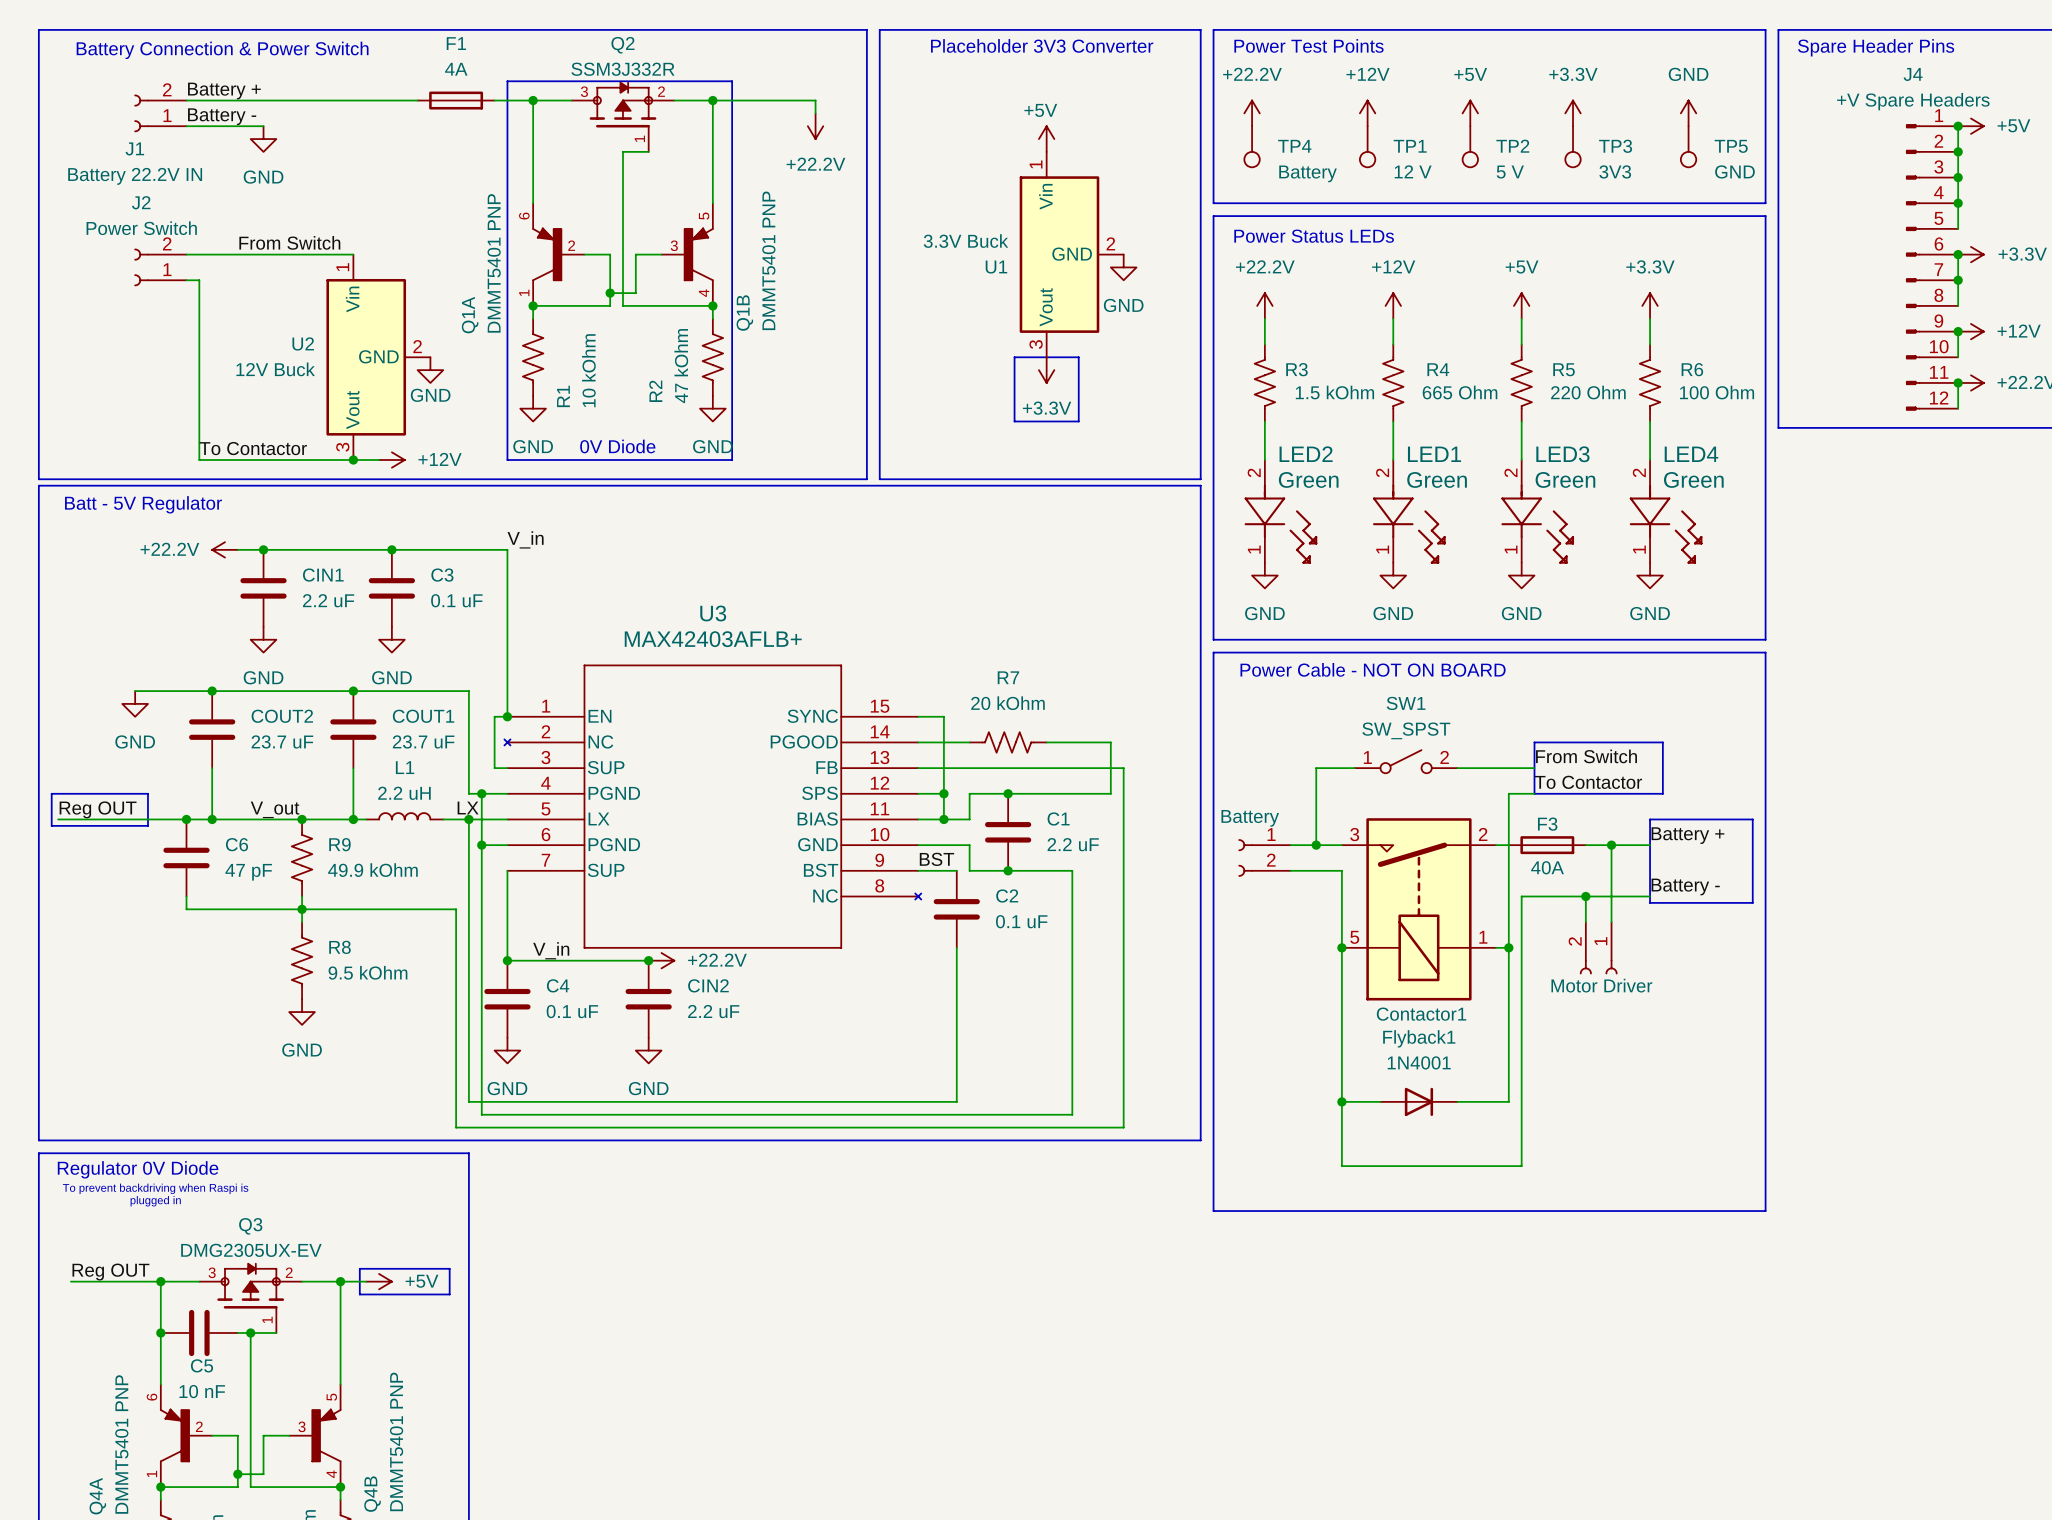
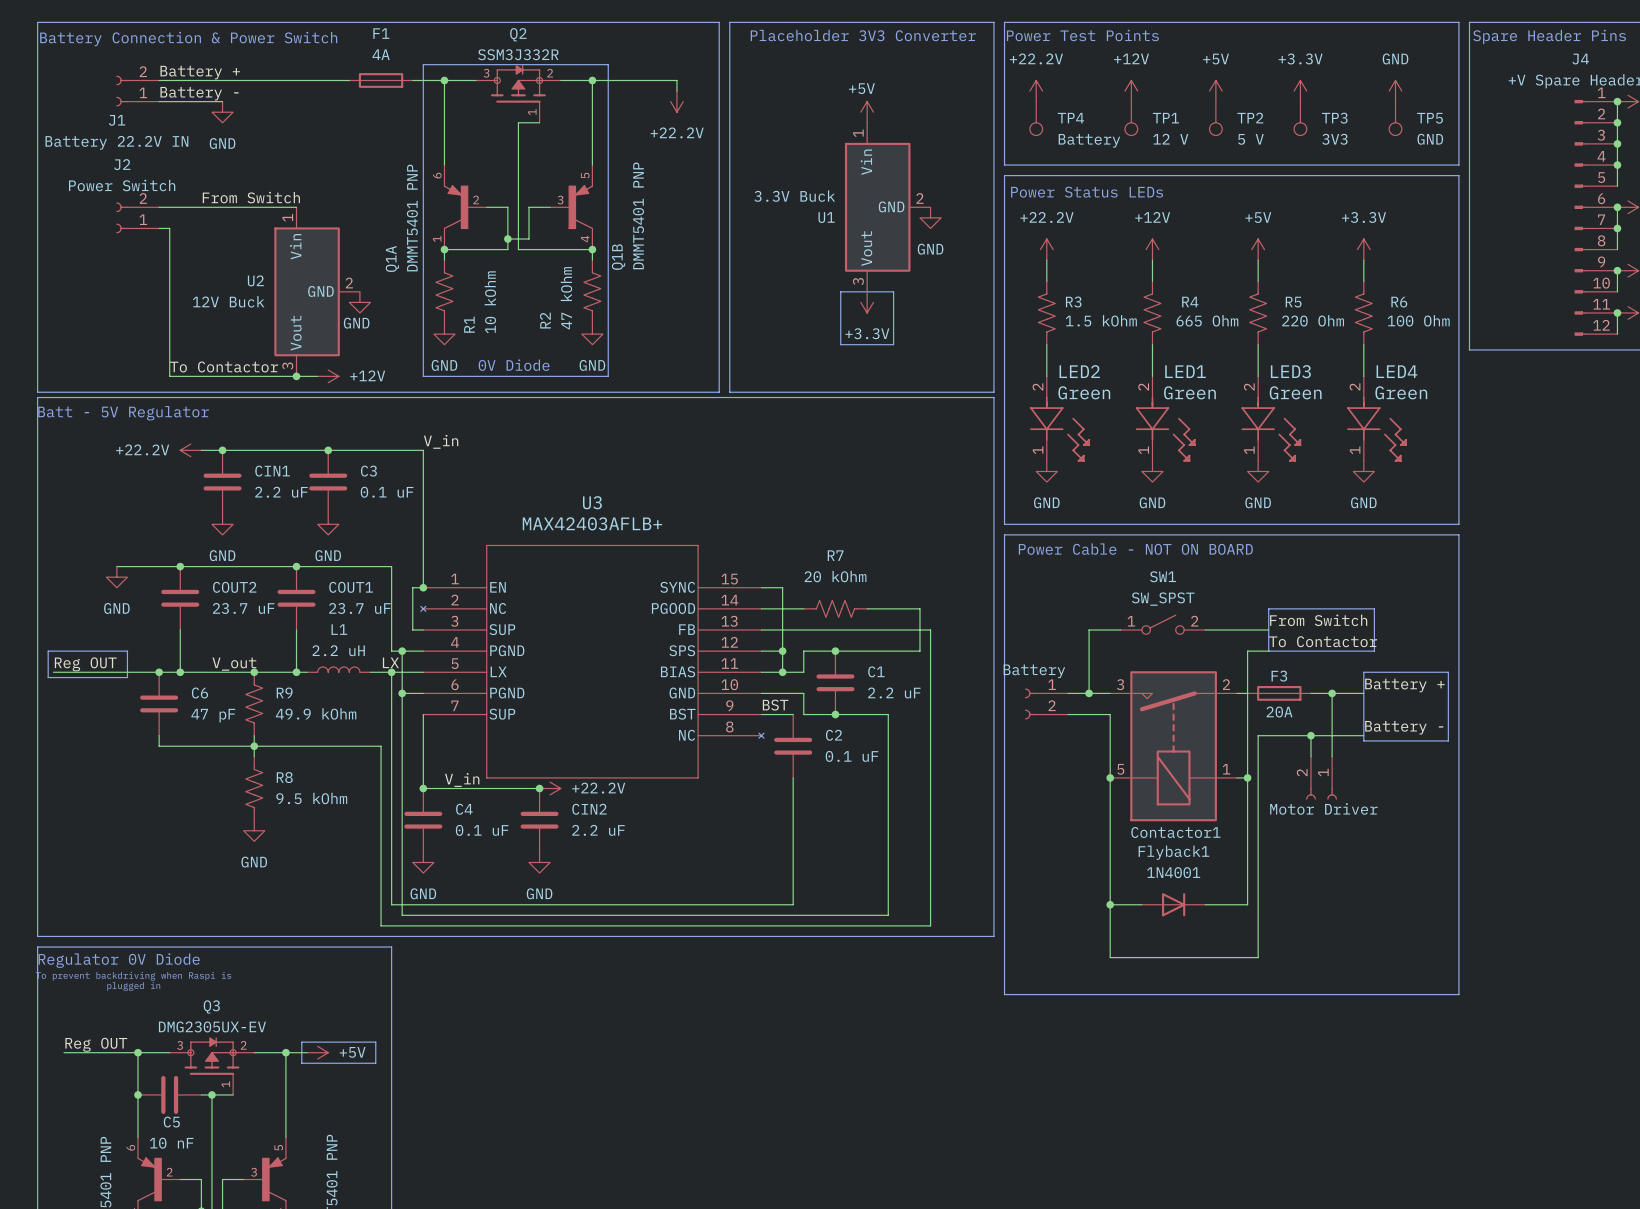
F3 value: 40A (1547, 867) -> 20A (1279, 712)

